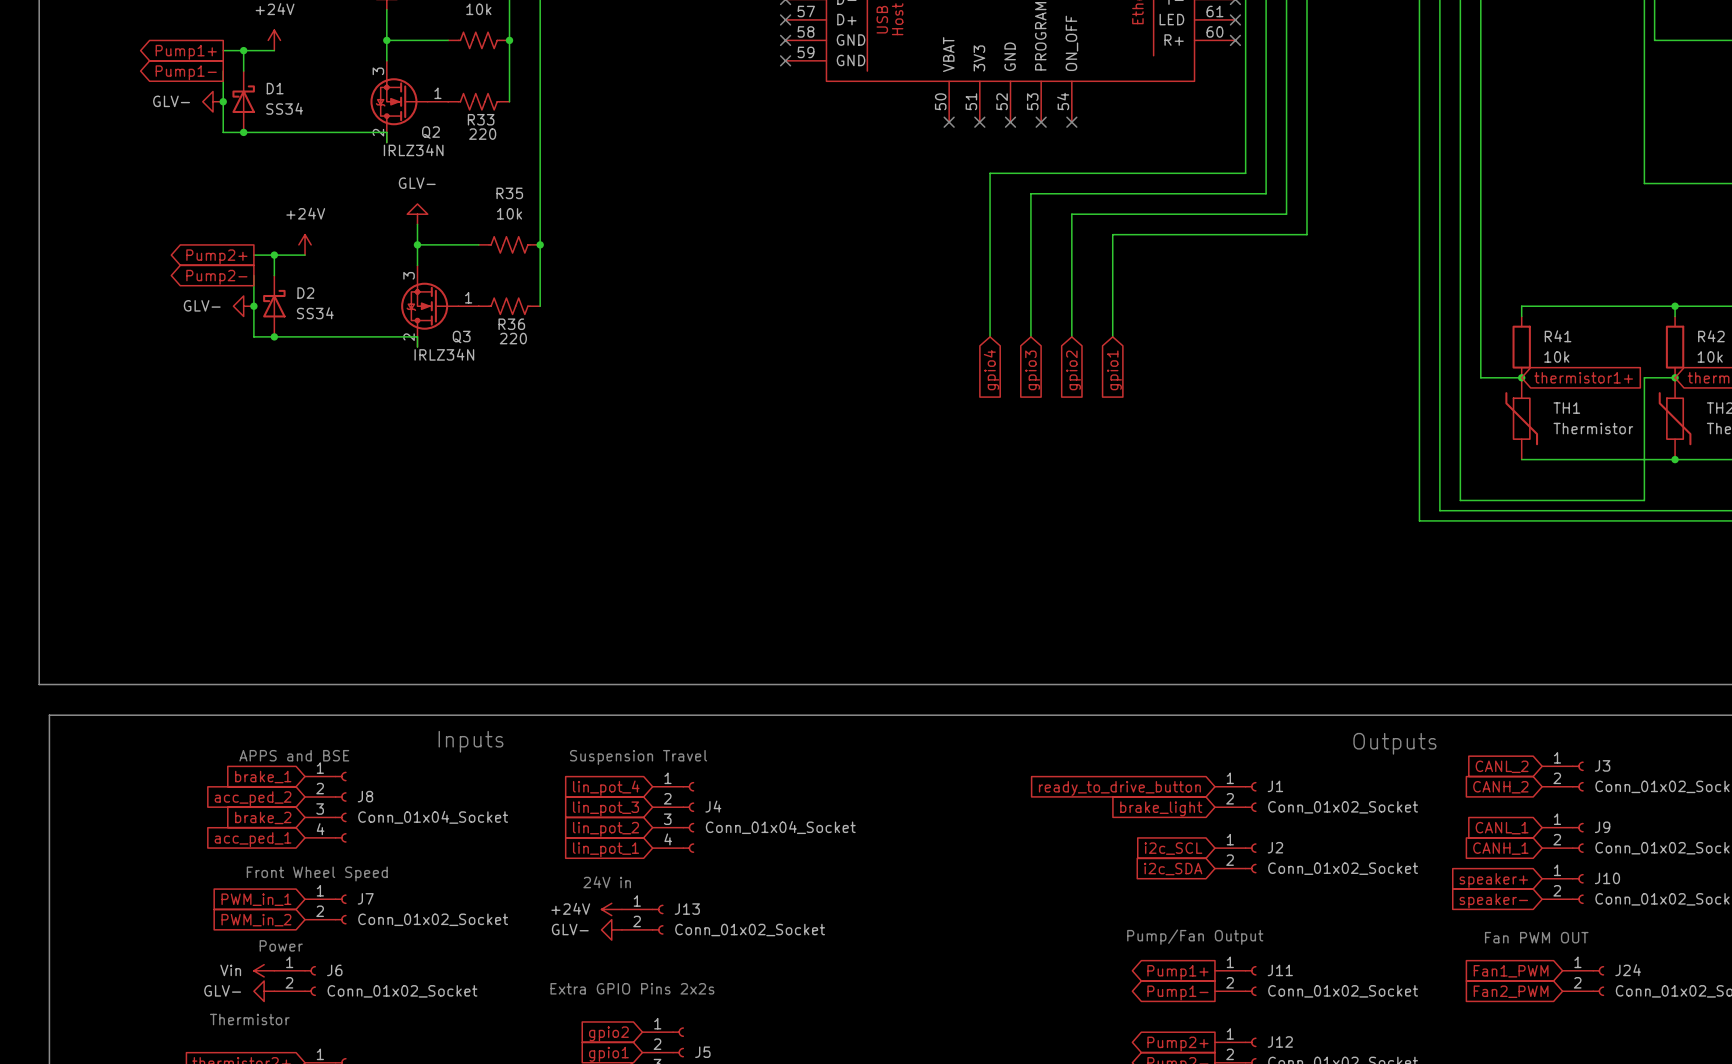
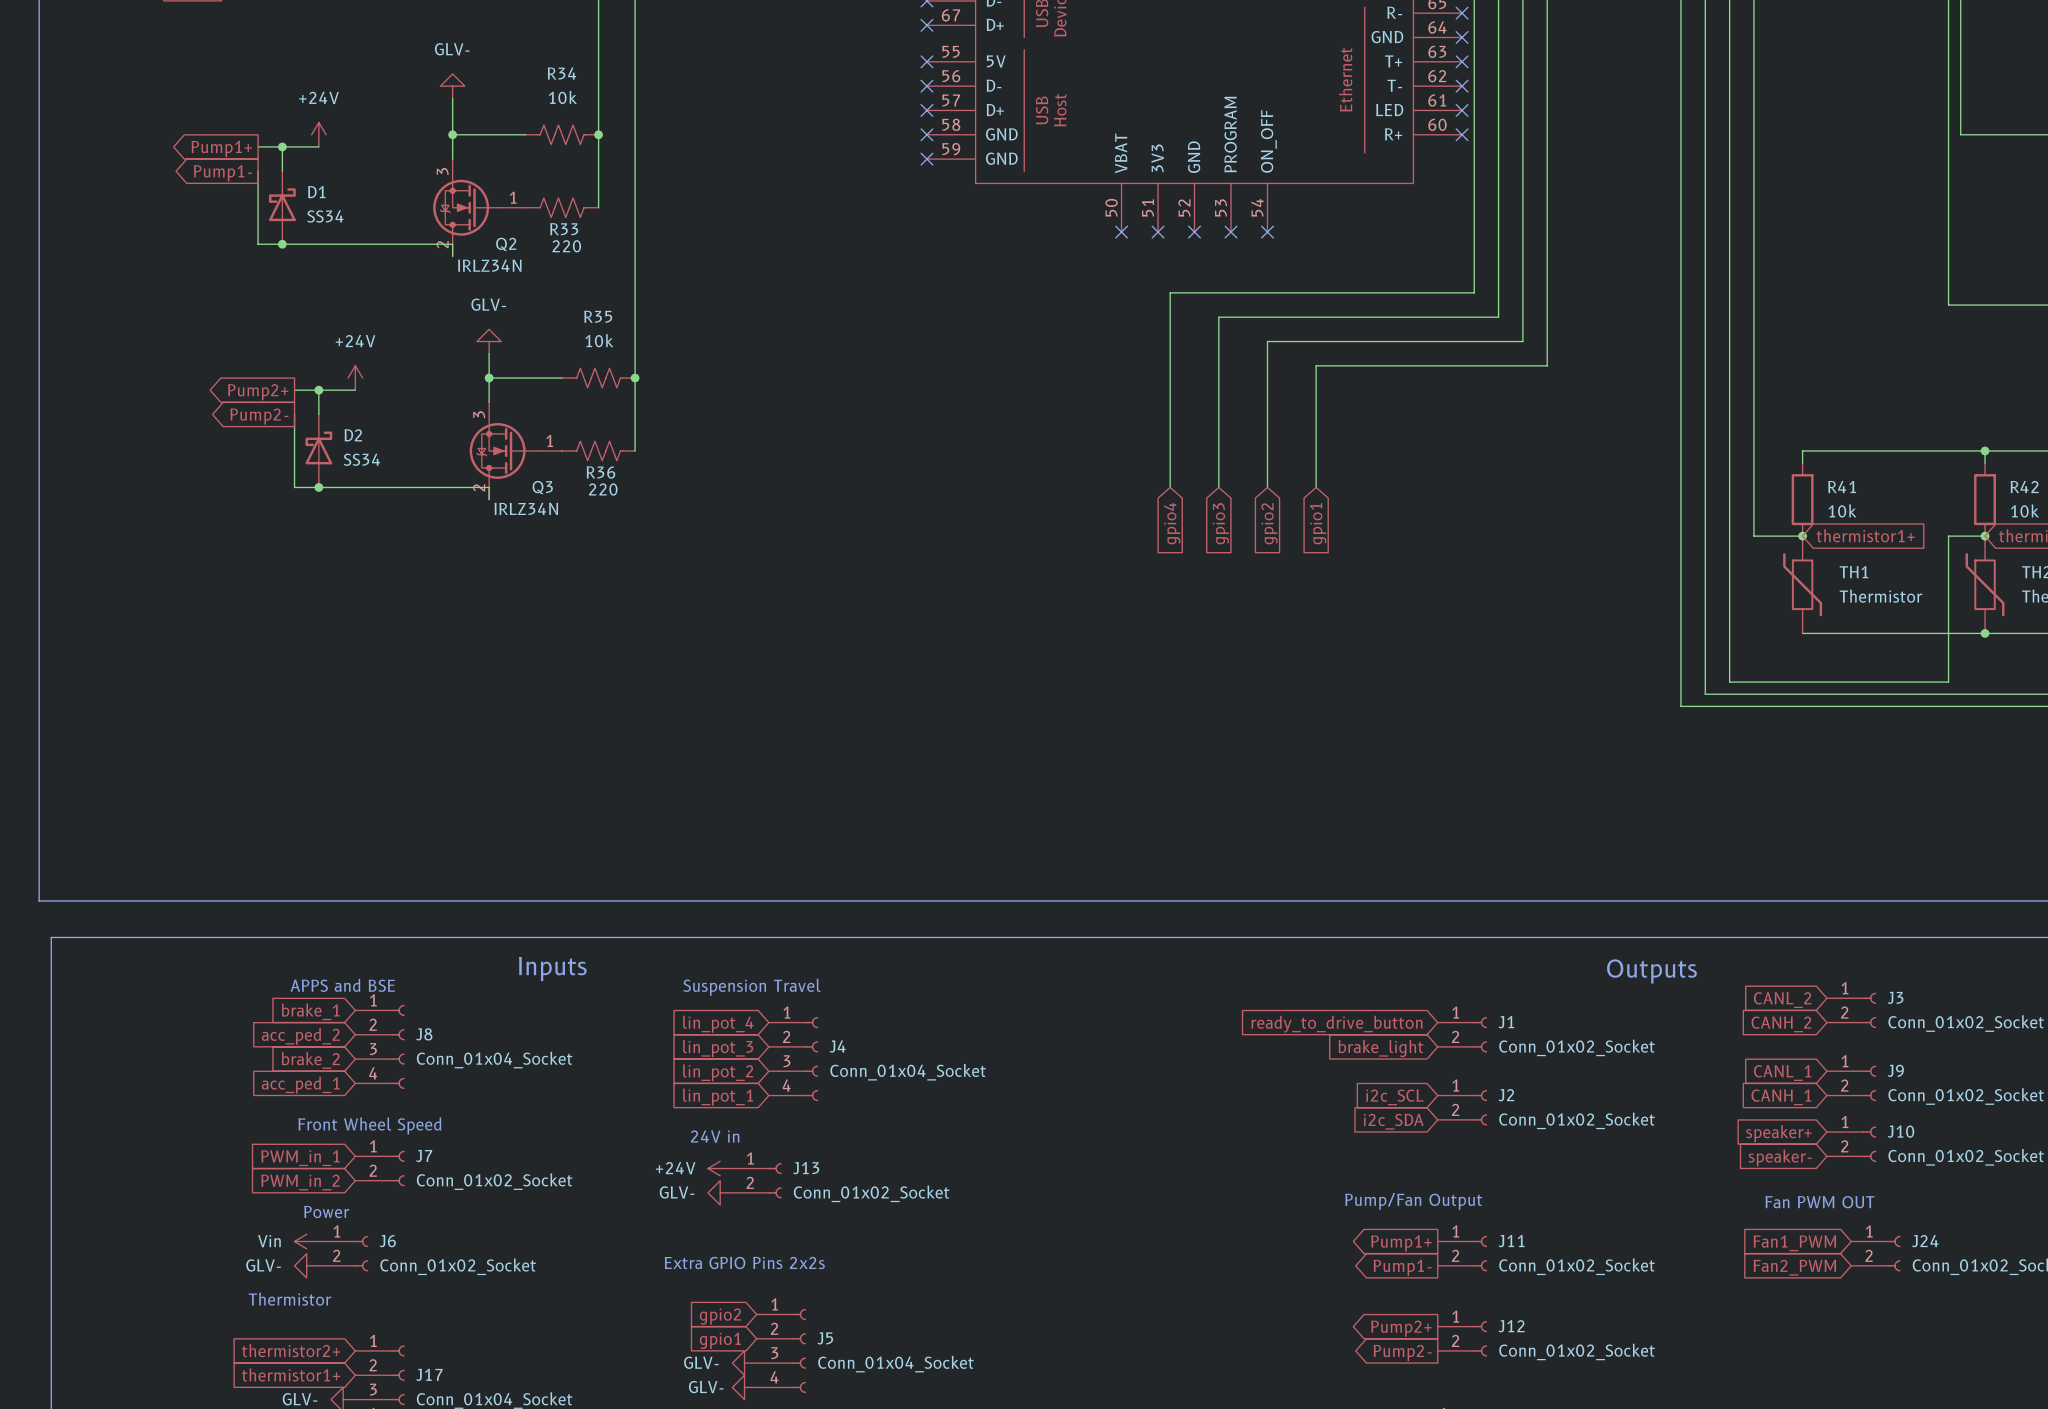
power symbol: GLV- (213, 101) -> none
junction: (223, 101) -> none
power symbol: GLV- (243, 306) -> none
junction: (253, 306) -> none

